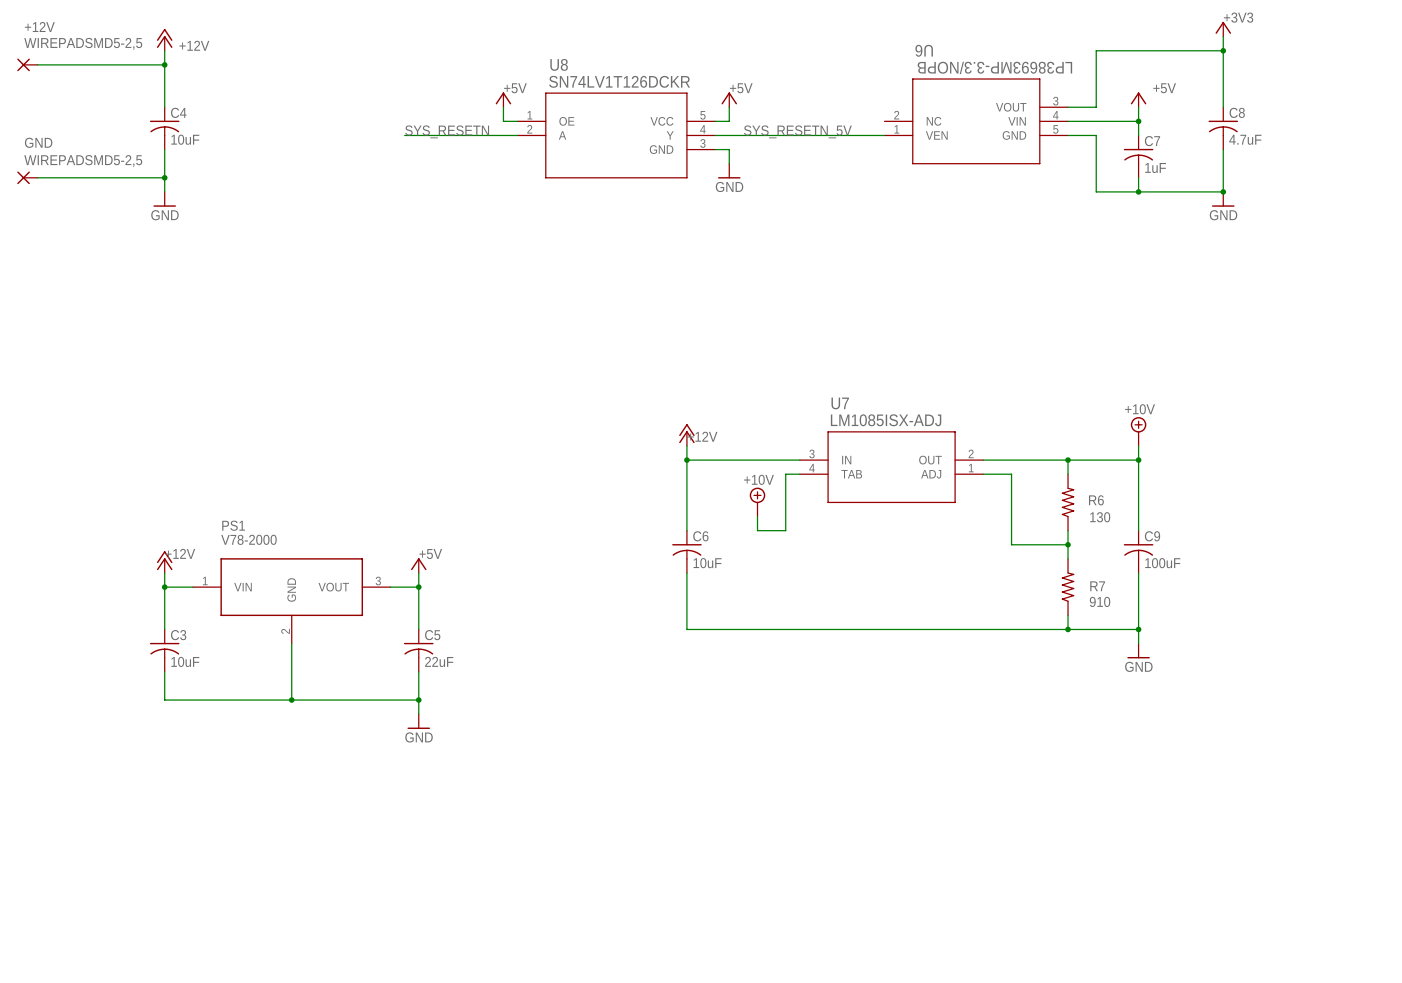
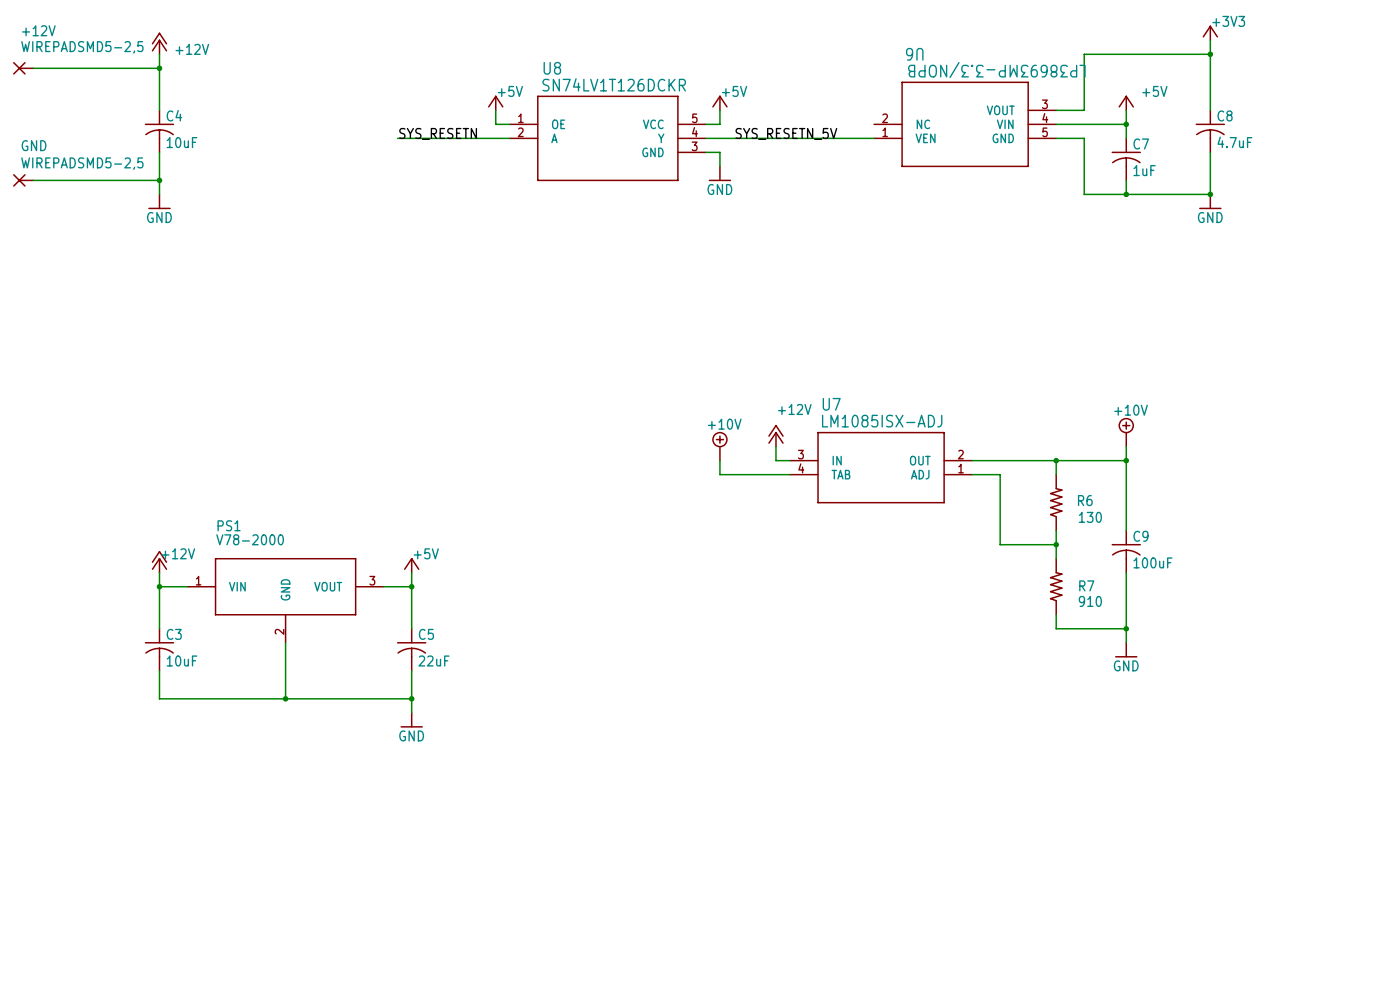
power symbol position: +12V (686, 435) -> +12V (775, 435)
power symbol text position: +12V (702, 436) -> +12V (794, 409)
wire: (686, 445) (686, 530) -> none
wire: (686, 460) (785, 460) -> (775, 446) (775, 460)
junction: (686, 460) -> none
wire: (785, 474) (785, 530) (757, 530) (757, 516) -> (775, 474) (719, 474) (719, 460)
power symbol position: +10V (757, 502) -> +10V (719, 446)
C6: 10uF (686, 551) -> none
wire: (686, 573) (686, 629) (1068, 629) -> none
junction: (1068, 629) -> none

